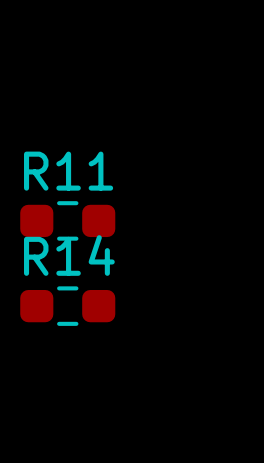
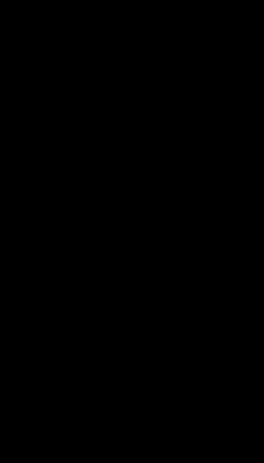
R11: (67, 220) -> none
R14: (67, 306) -> none

